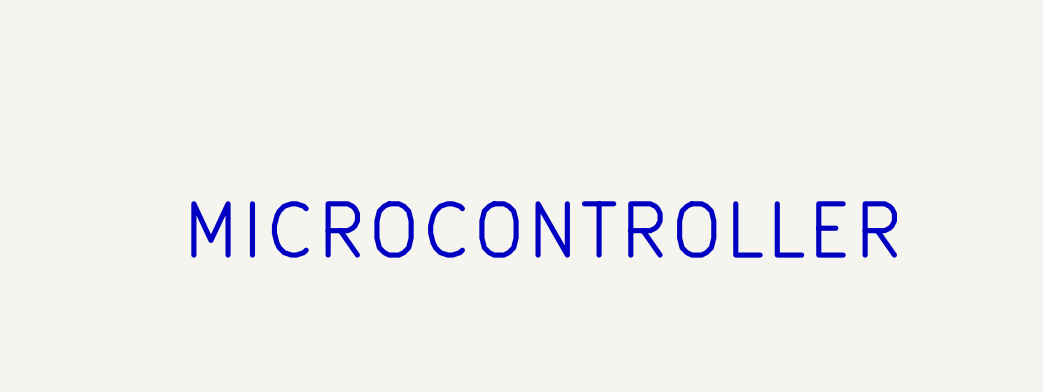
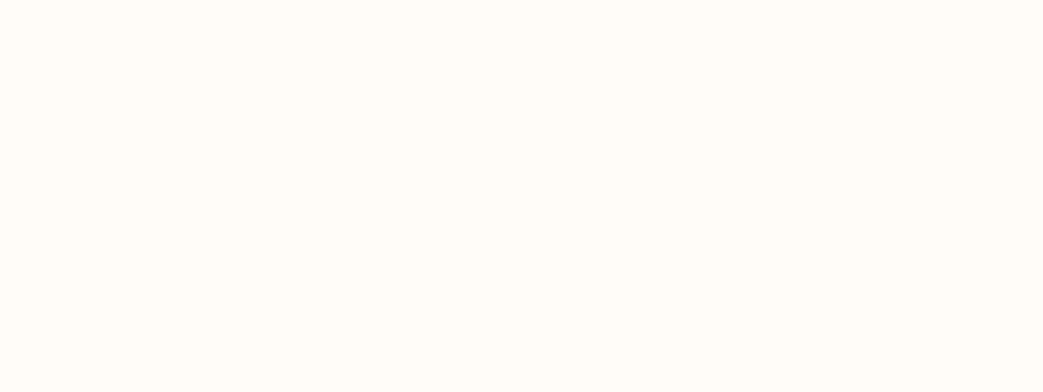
text: MICROCONTROLLER (544, 229) -> none

